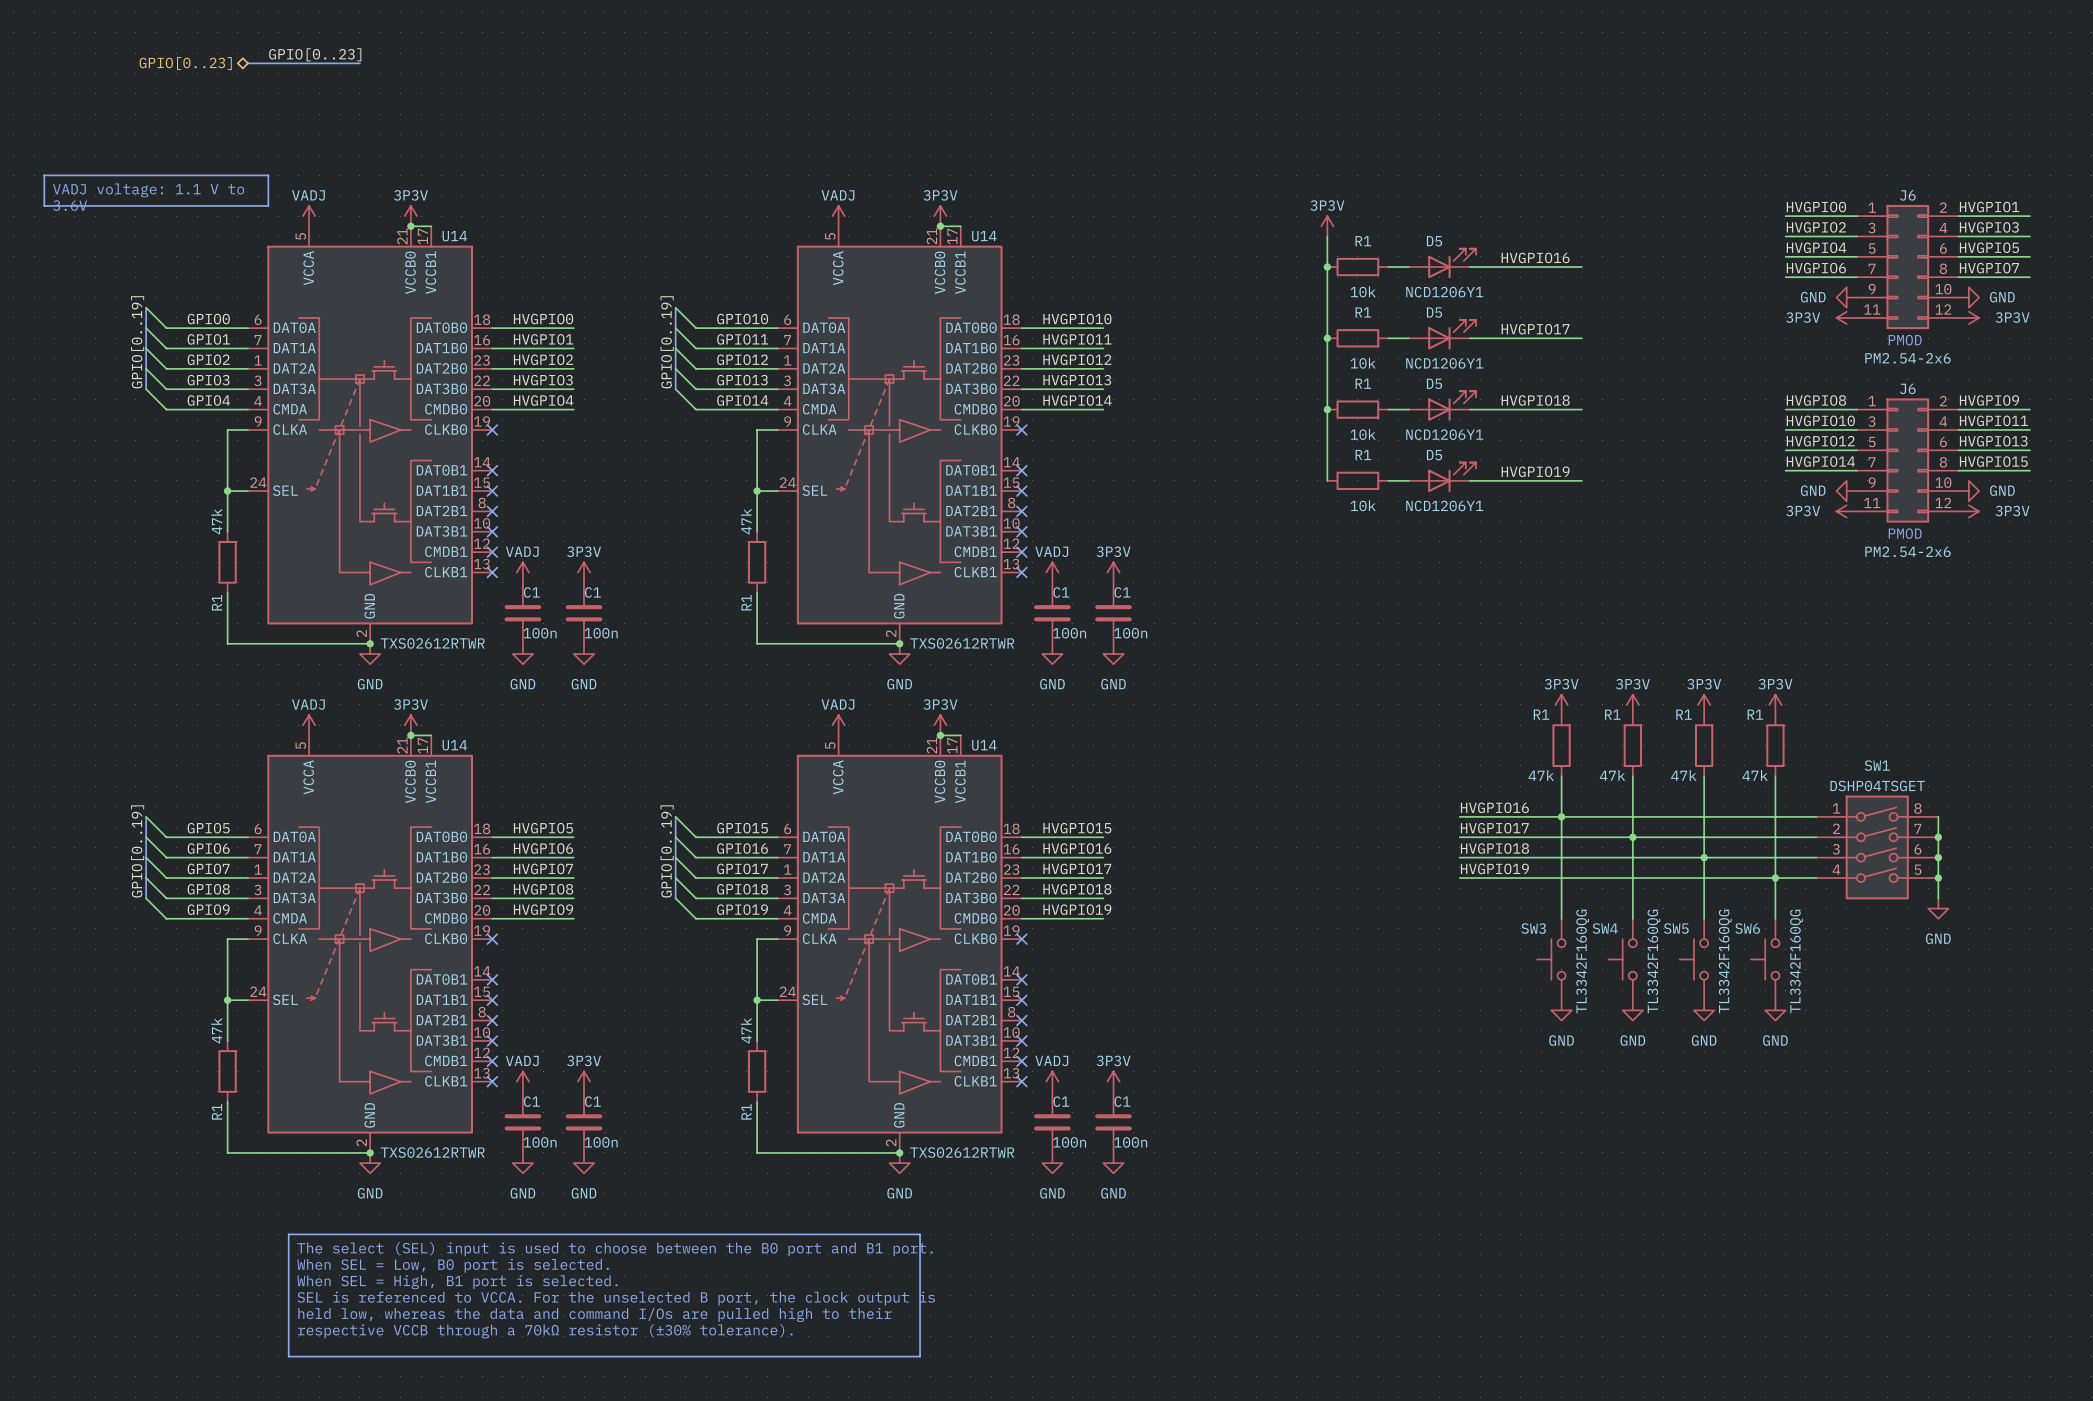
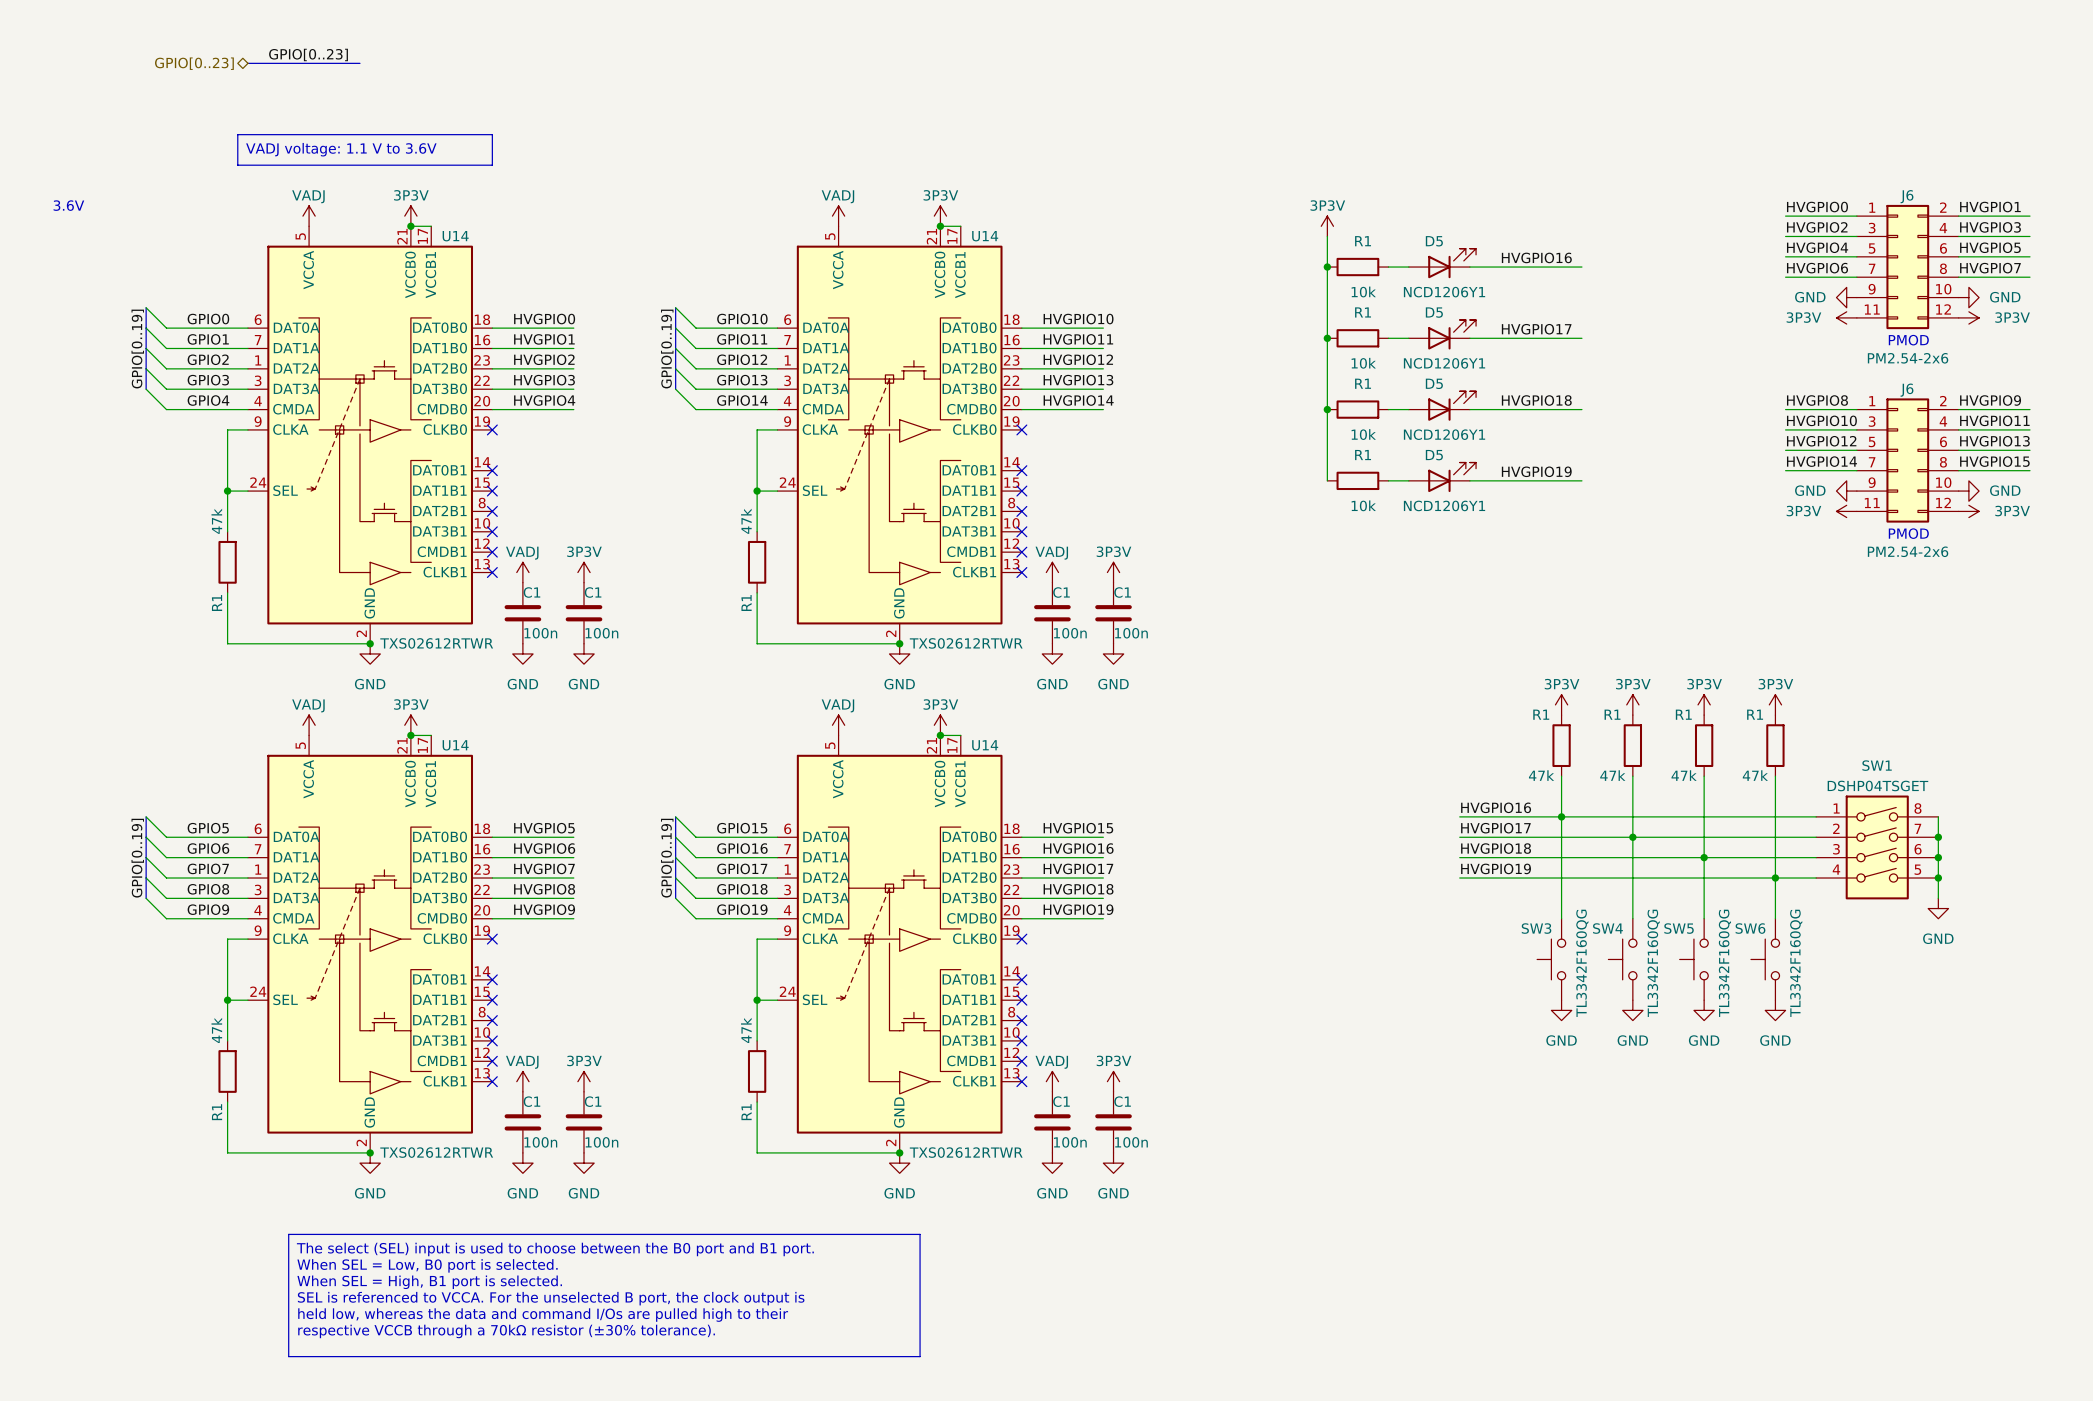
line: none -> (237, 134) (492, 134) (492, 165) (237, 165) (237, 134)
text: none -> VADJ voltage: 1.1 V to 3.6V (341, 149)
line: (44, 175) (268, 175) (268, 205) (44, 205) (44, 175) -> none
text: VADJ voltage: 1.1 V to (148, 190) -> none

